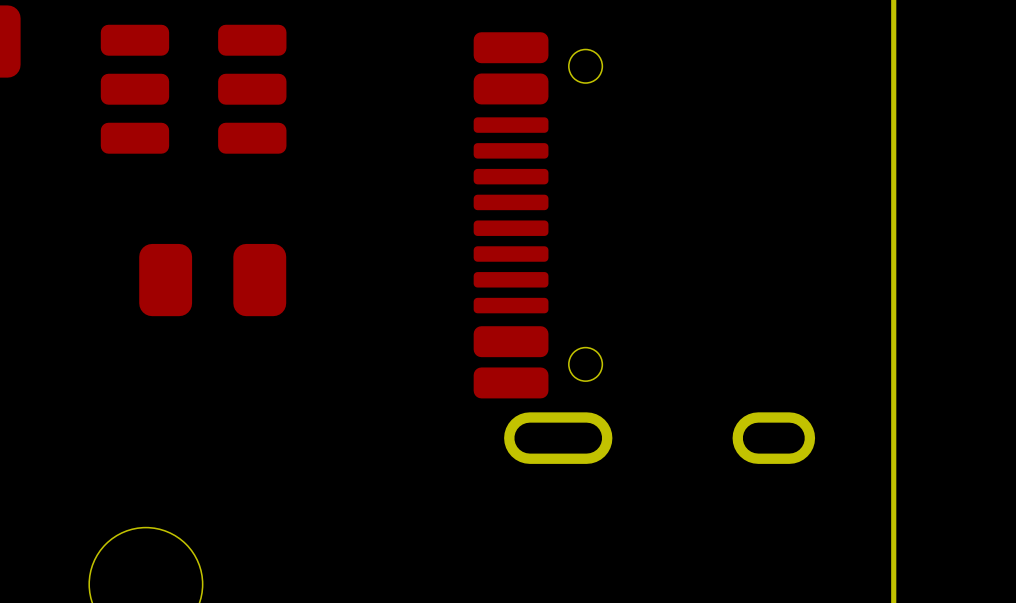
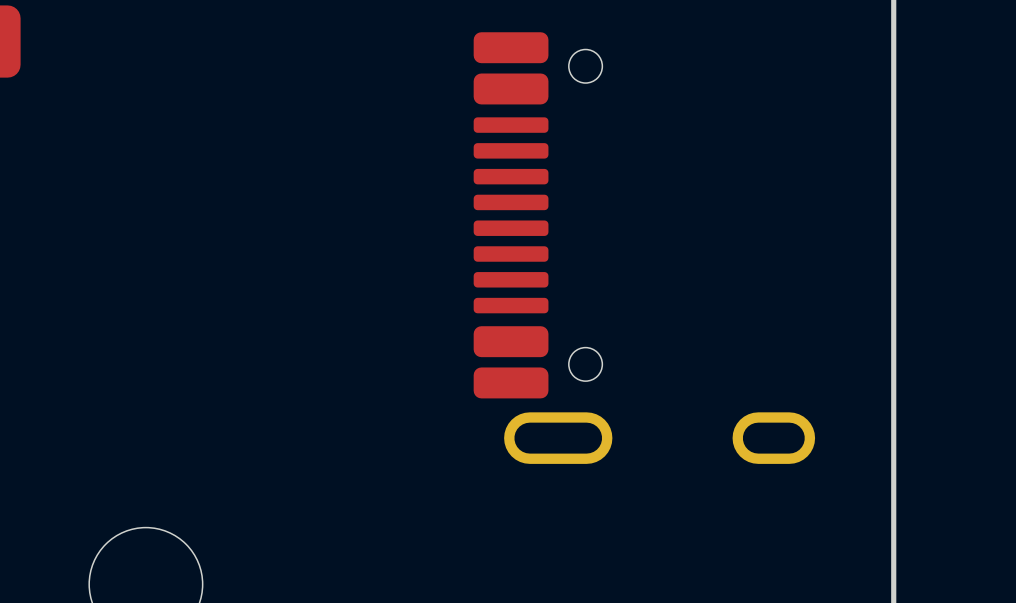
part: (193, 89) -> none
part: (212, 280) -> none

